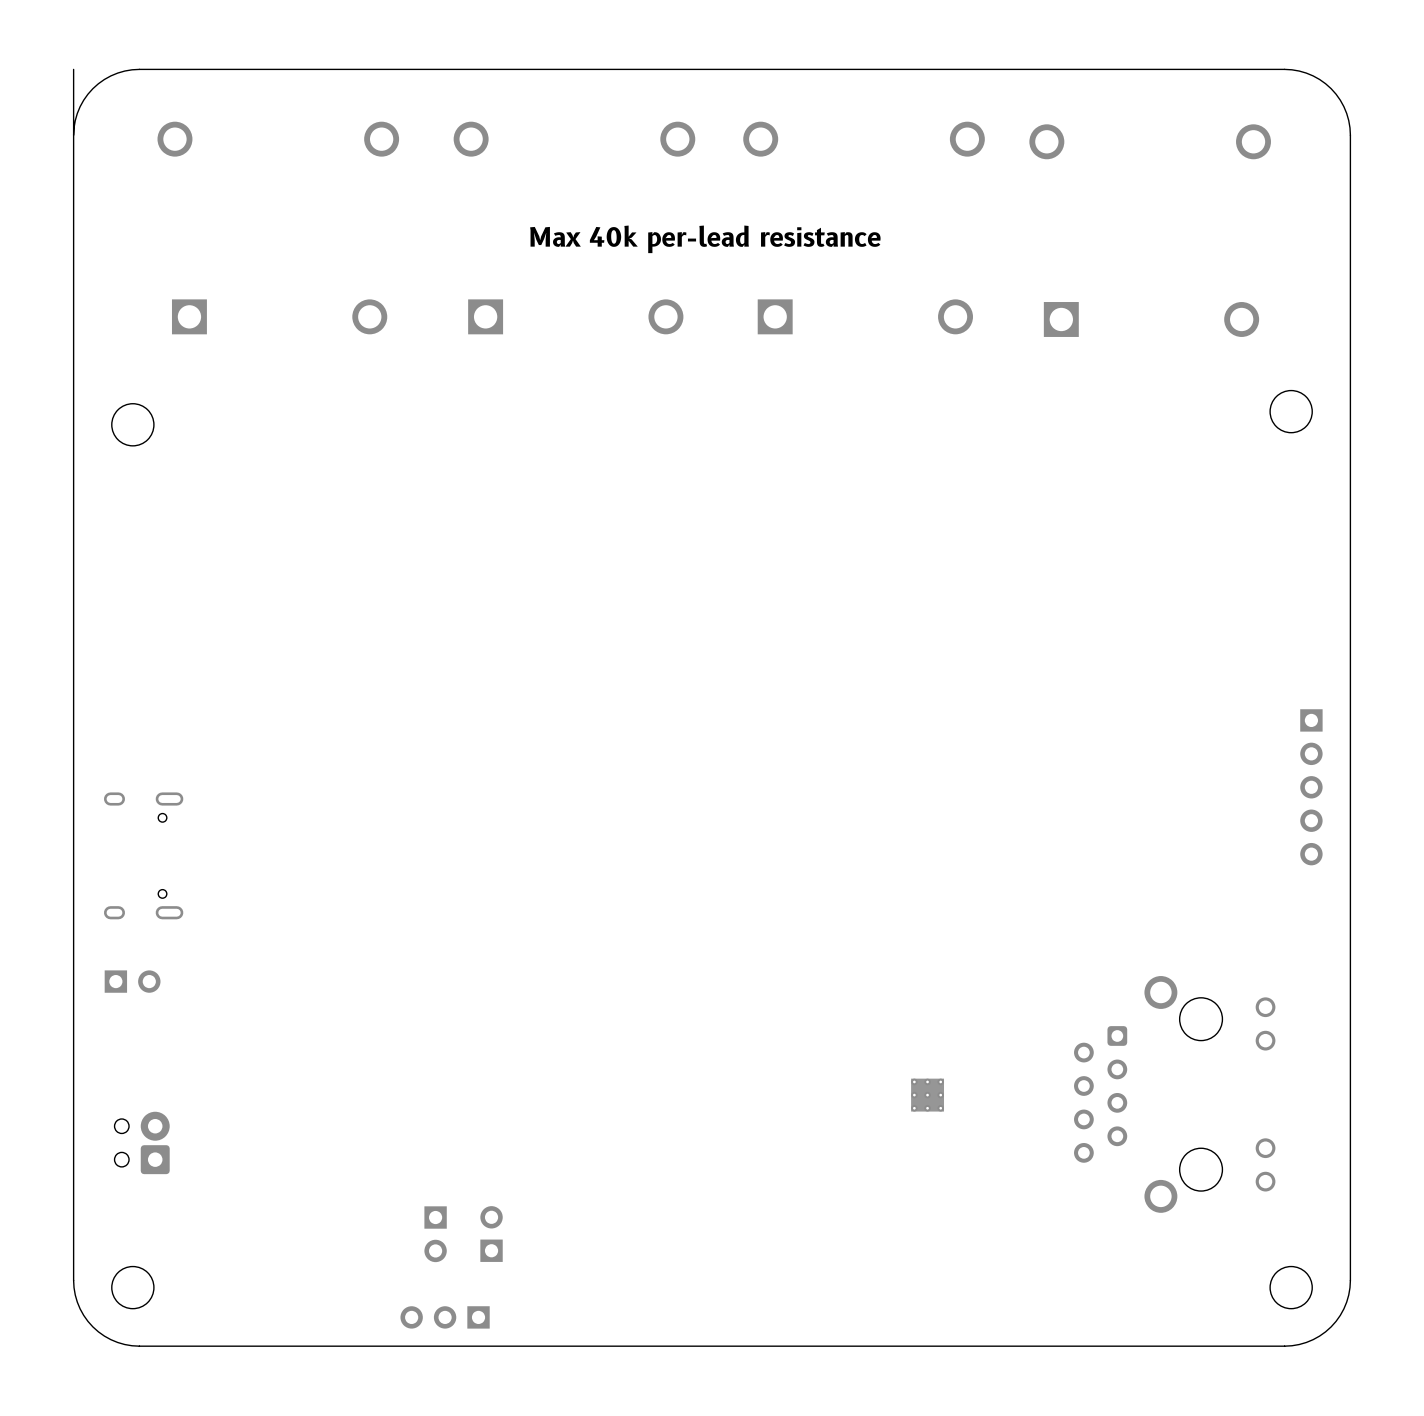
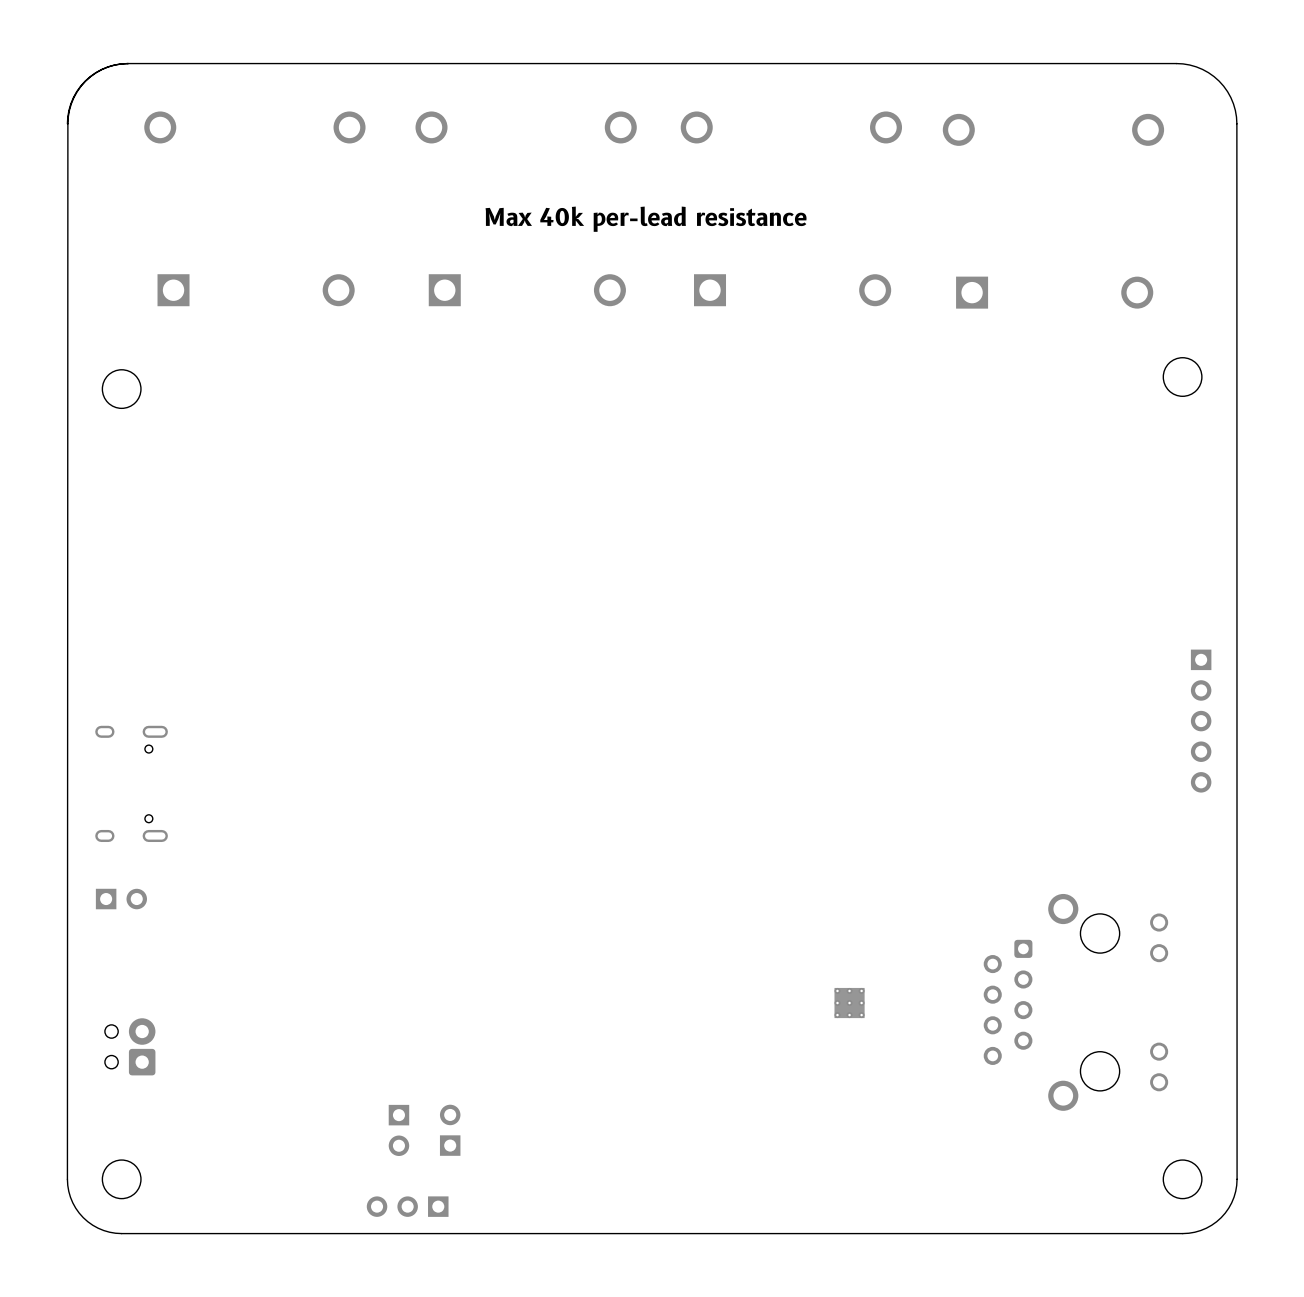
board edge: (1284, 69) (1306, 73) (1319, 79) (1331, 88) (1340, 100) (1346, 113) (1350, 135) (1350, 1280) (1348, 1295) (1343, 1308) (1331, 1326) (1313, 1339) (1299, 1344) (1284, 1346) (139, 1346) (117, 1342) (104, 1336) (92, 1326) (80, 1308) (75, 1295) (73, 1280) (73, 69) -> (1176, 63) (1189, 65) (1202, 69) (1219, 81) (1227, 91) (1233, 103) (1236, 123) (1237, 1179) (1231, 1202) (1221, 1217) (1206, 1228) (1182, 1233) (121, 1233) (98, 1228) (83, 1217) (70, 1197) (67, 1179) (67, 123) (71, 103) (77, 91) (85, 81) (96, 72) (108, 66) (128, 63)

